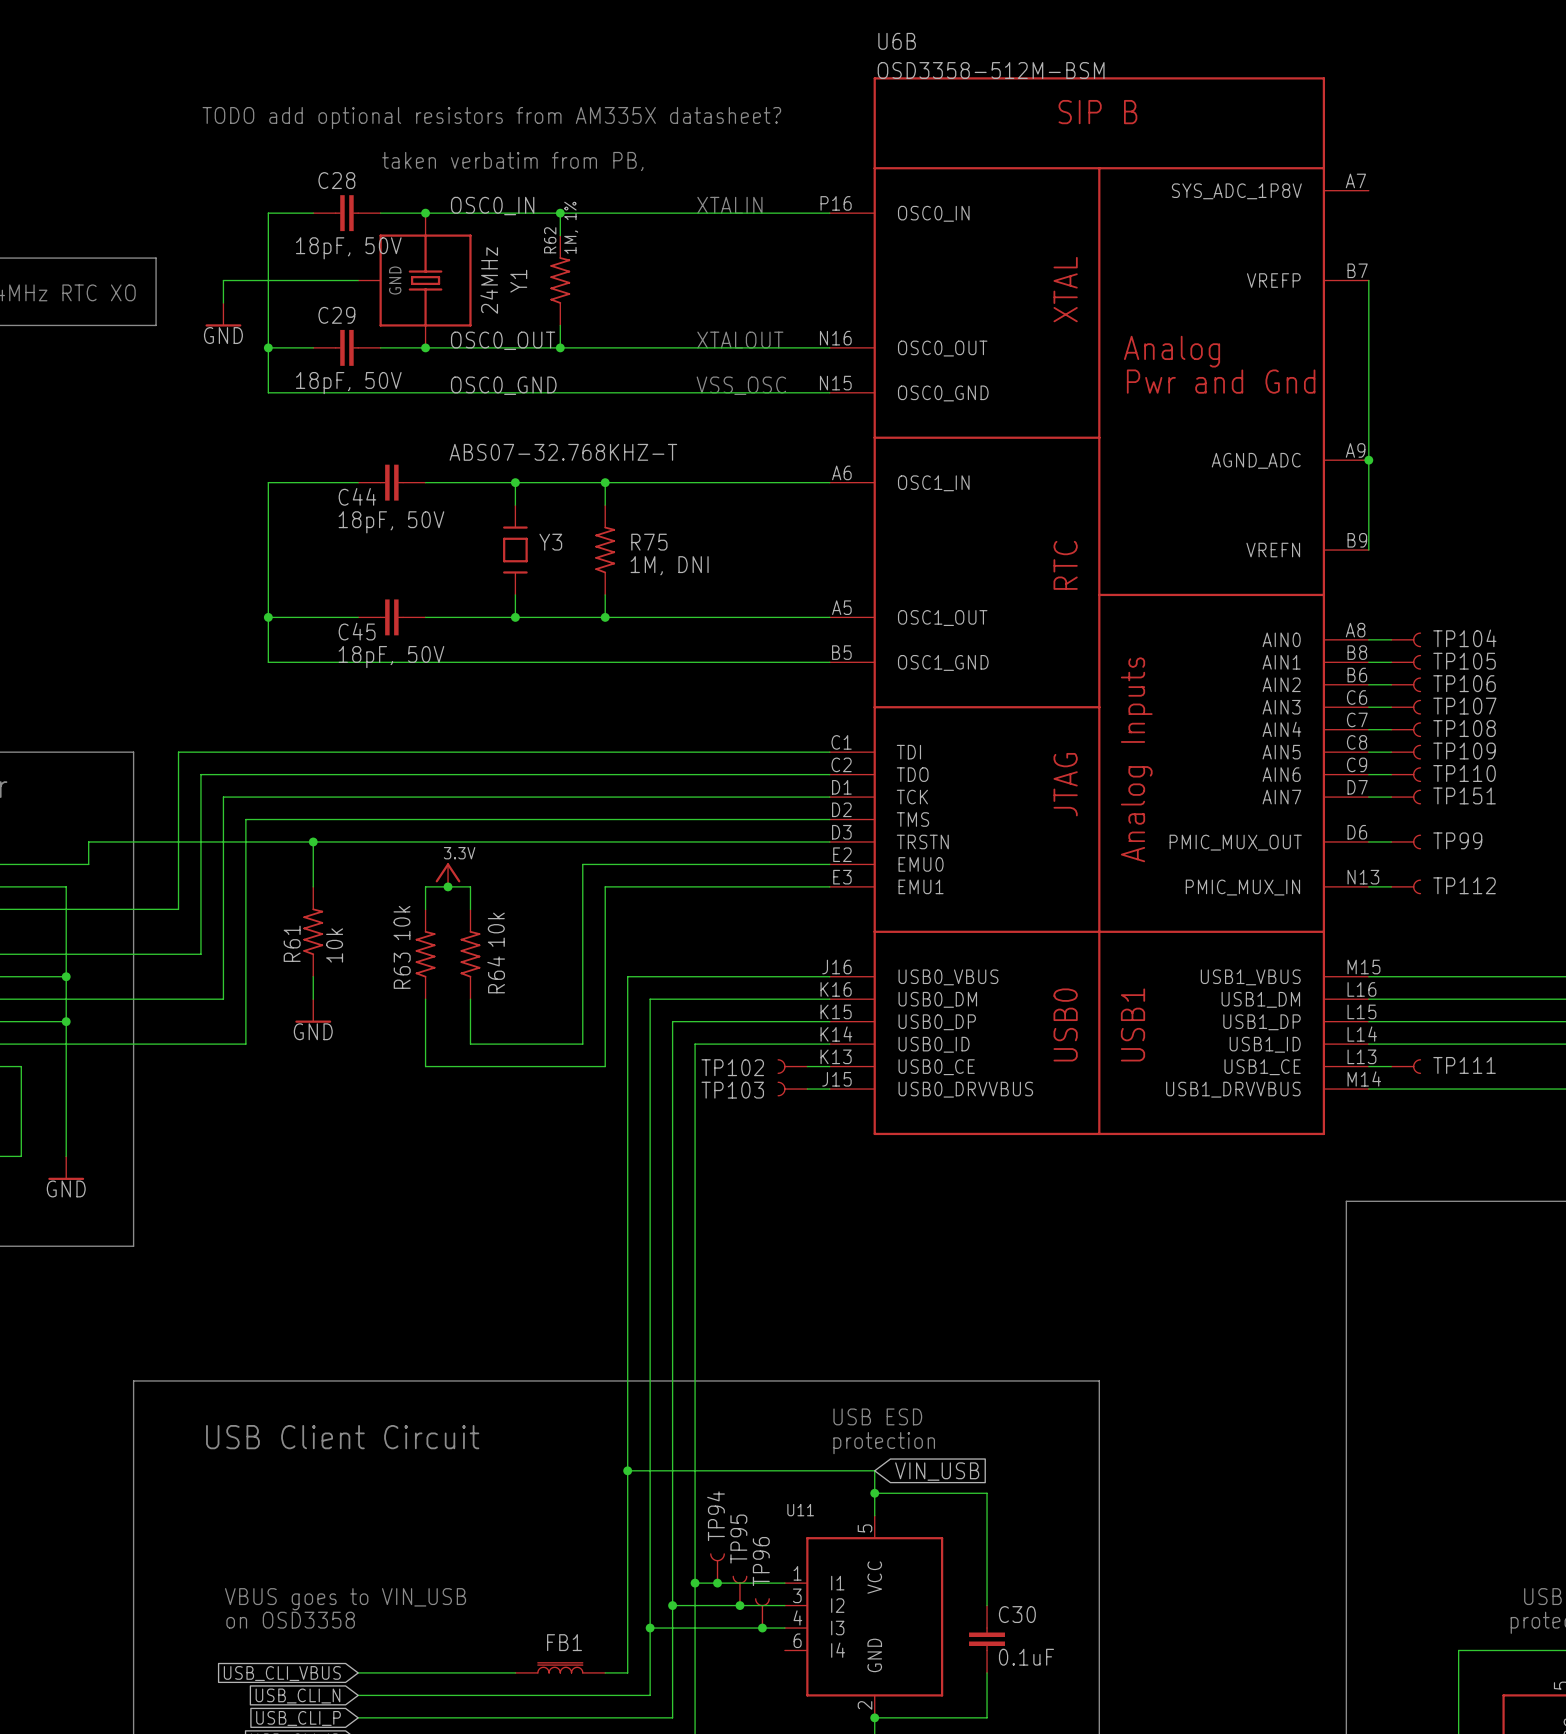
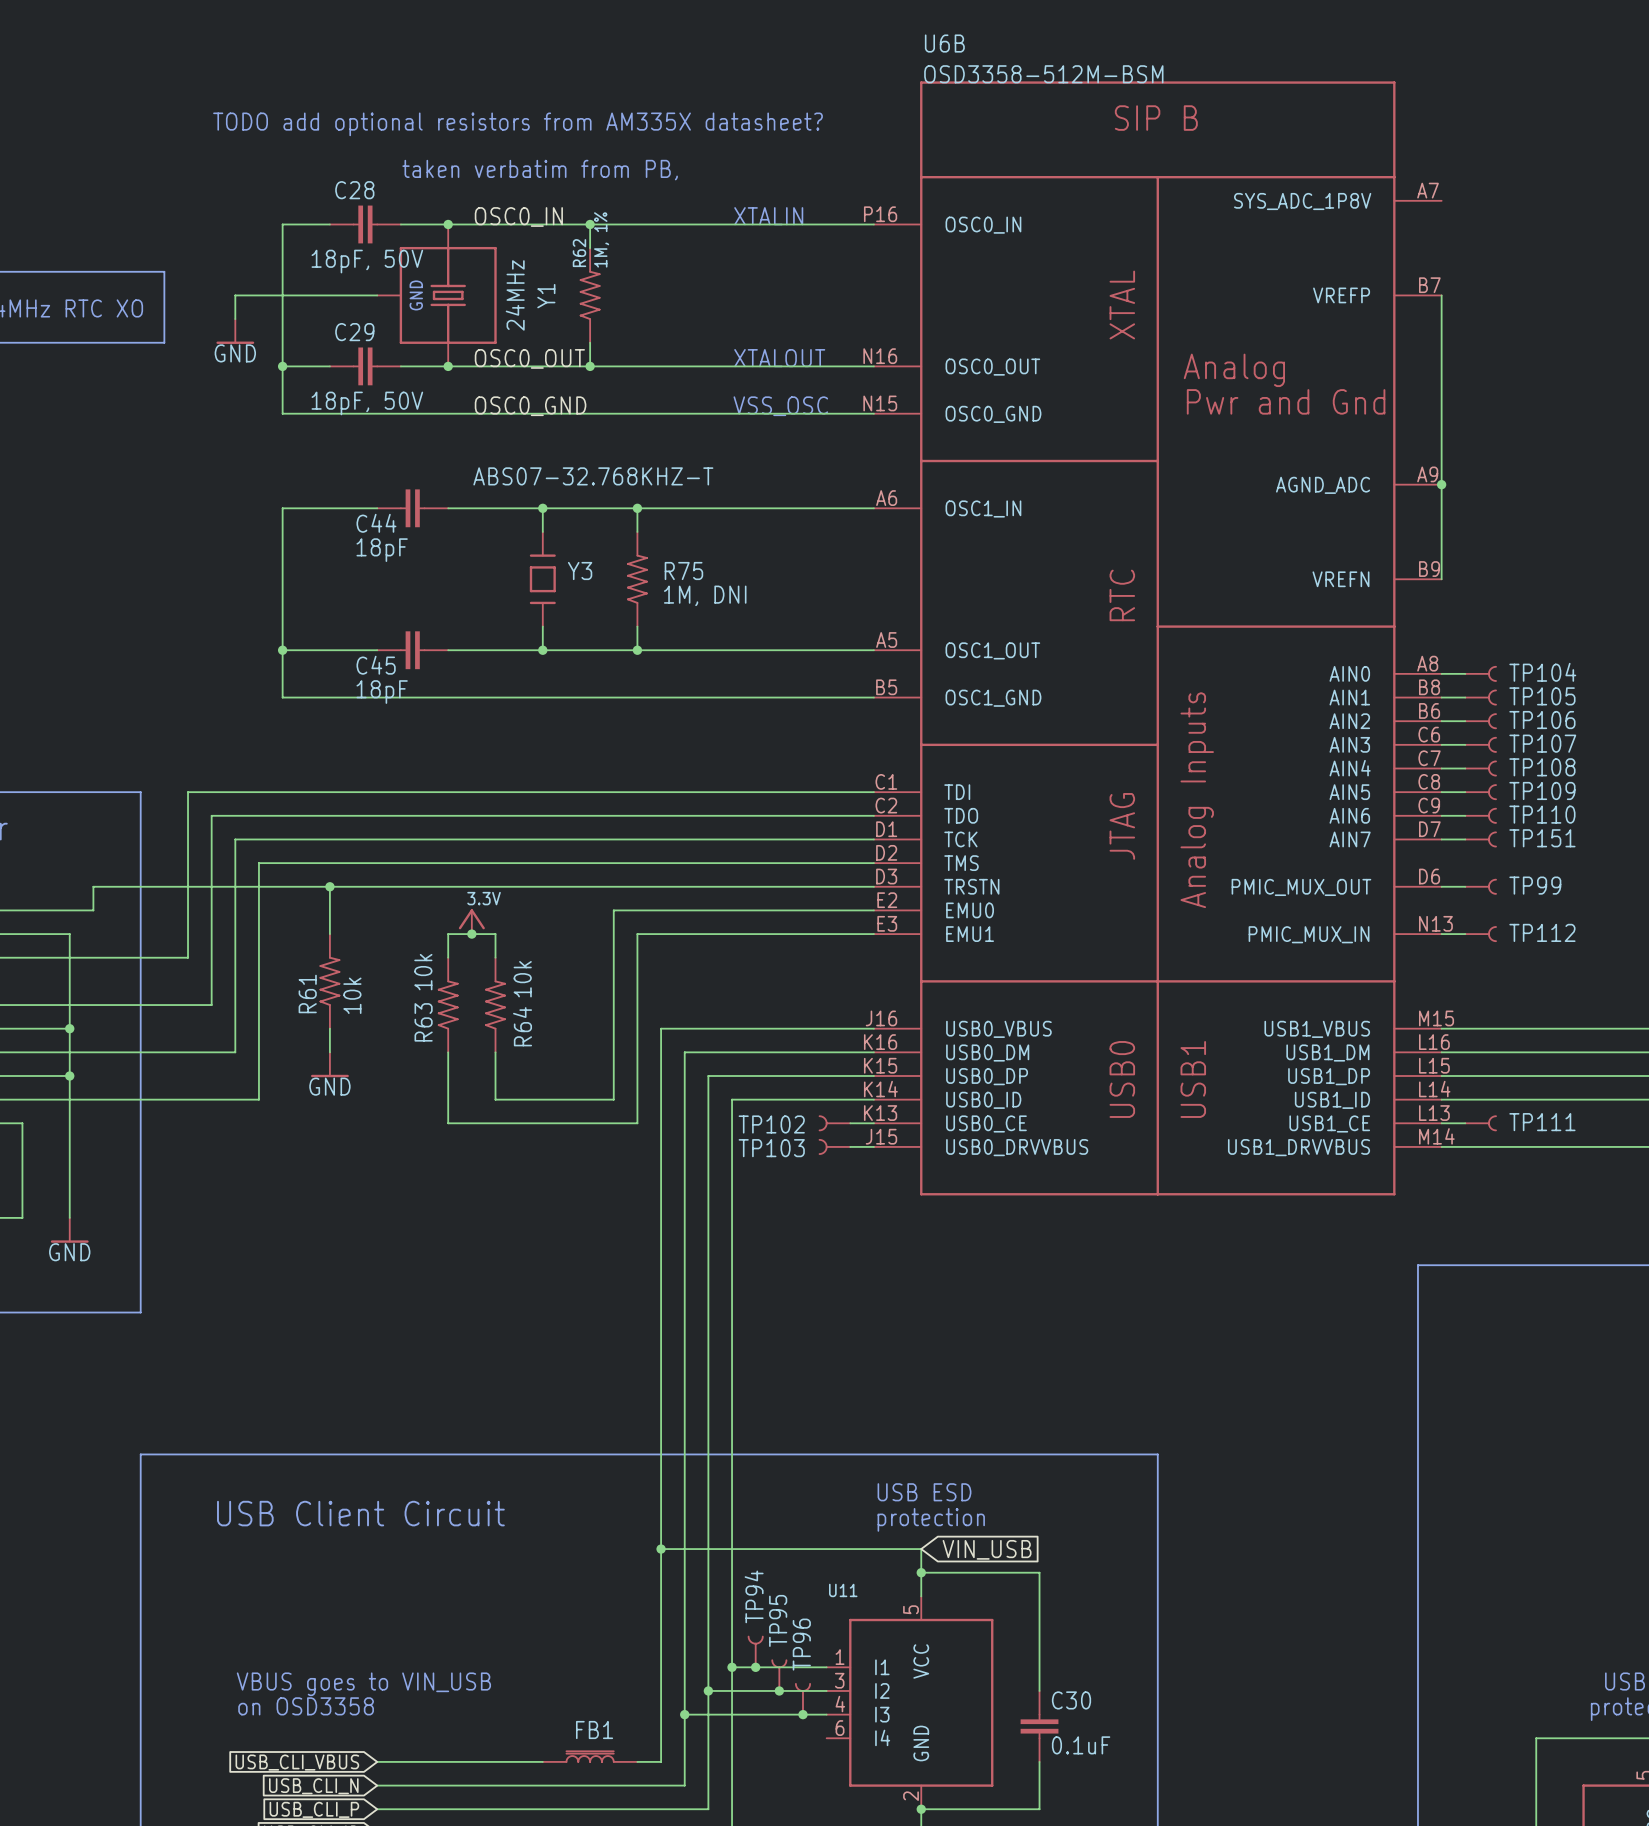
C44 value: 18pF, 50V (391, 522) -> 18pF (382, 550)
C45 value: 18pF, 50V (391, 657) -> 18pF (382, 692)

